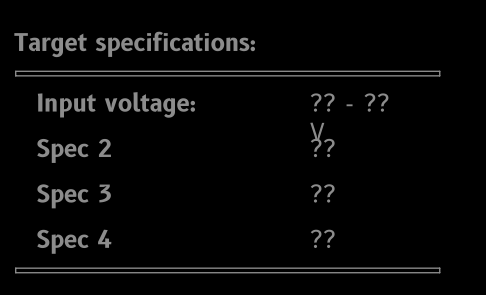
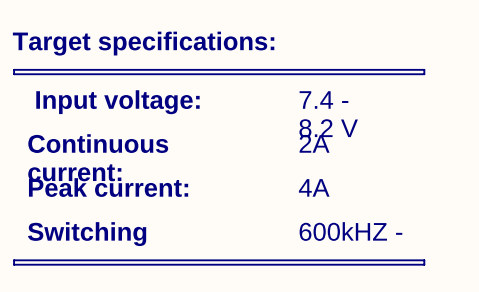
text: ?? - ?? (349, 102) -> 7.4 - (323, 99)
text: V (317, 131) -> 8.2 V (328, 128)
text: ?? (322, 147) -> 2A (314, 143)
text: none -> Continuous (98, 143)
text: Spec 2 (74, 150) -> none
text: none -> current: (74, 172)
text: none -> Peak current: (108, 187)
text: ?? (322, 193) -> 4A (314, 187)
text: Spec 3 (74, 196) -> none
text: ?? (322, 238) -> 600kHZ - (350, 231)
text: Spec 4 (74, 241) -> none
text: none -> Switching (87, 234)

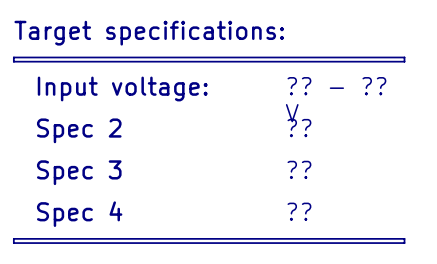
text: 7.4 - (323, 99) -> ?? - ?? (336, 86)
text: 8.2 V (328, 128) -> V (292, 113)
text: Continuous (98, 143) -> none
text: 2A (314, 143) -> ?? (299, 128)
text: none -> Spec 2 (79, 130)
text: current: (74, 172) -> none
text: Peak current: (108, 187) -> none
text: 4A (314, 187) -> ?? (299, 169)
text: none -> Spec 3 (79, 172)
text: 600kHZ - (350, 231) -> ?? (299, 211)
text: none -> Spec 4 (79, 214)
text: Switching (87, 234) -> none

